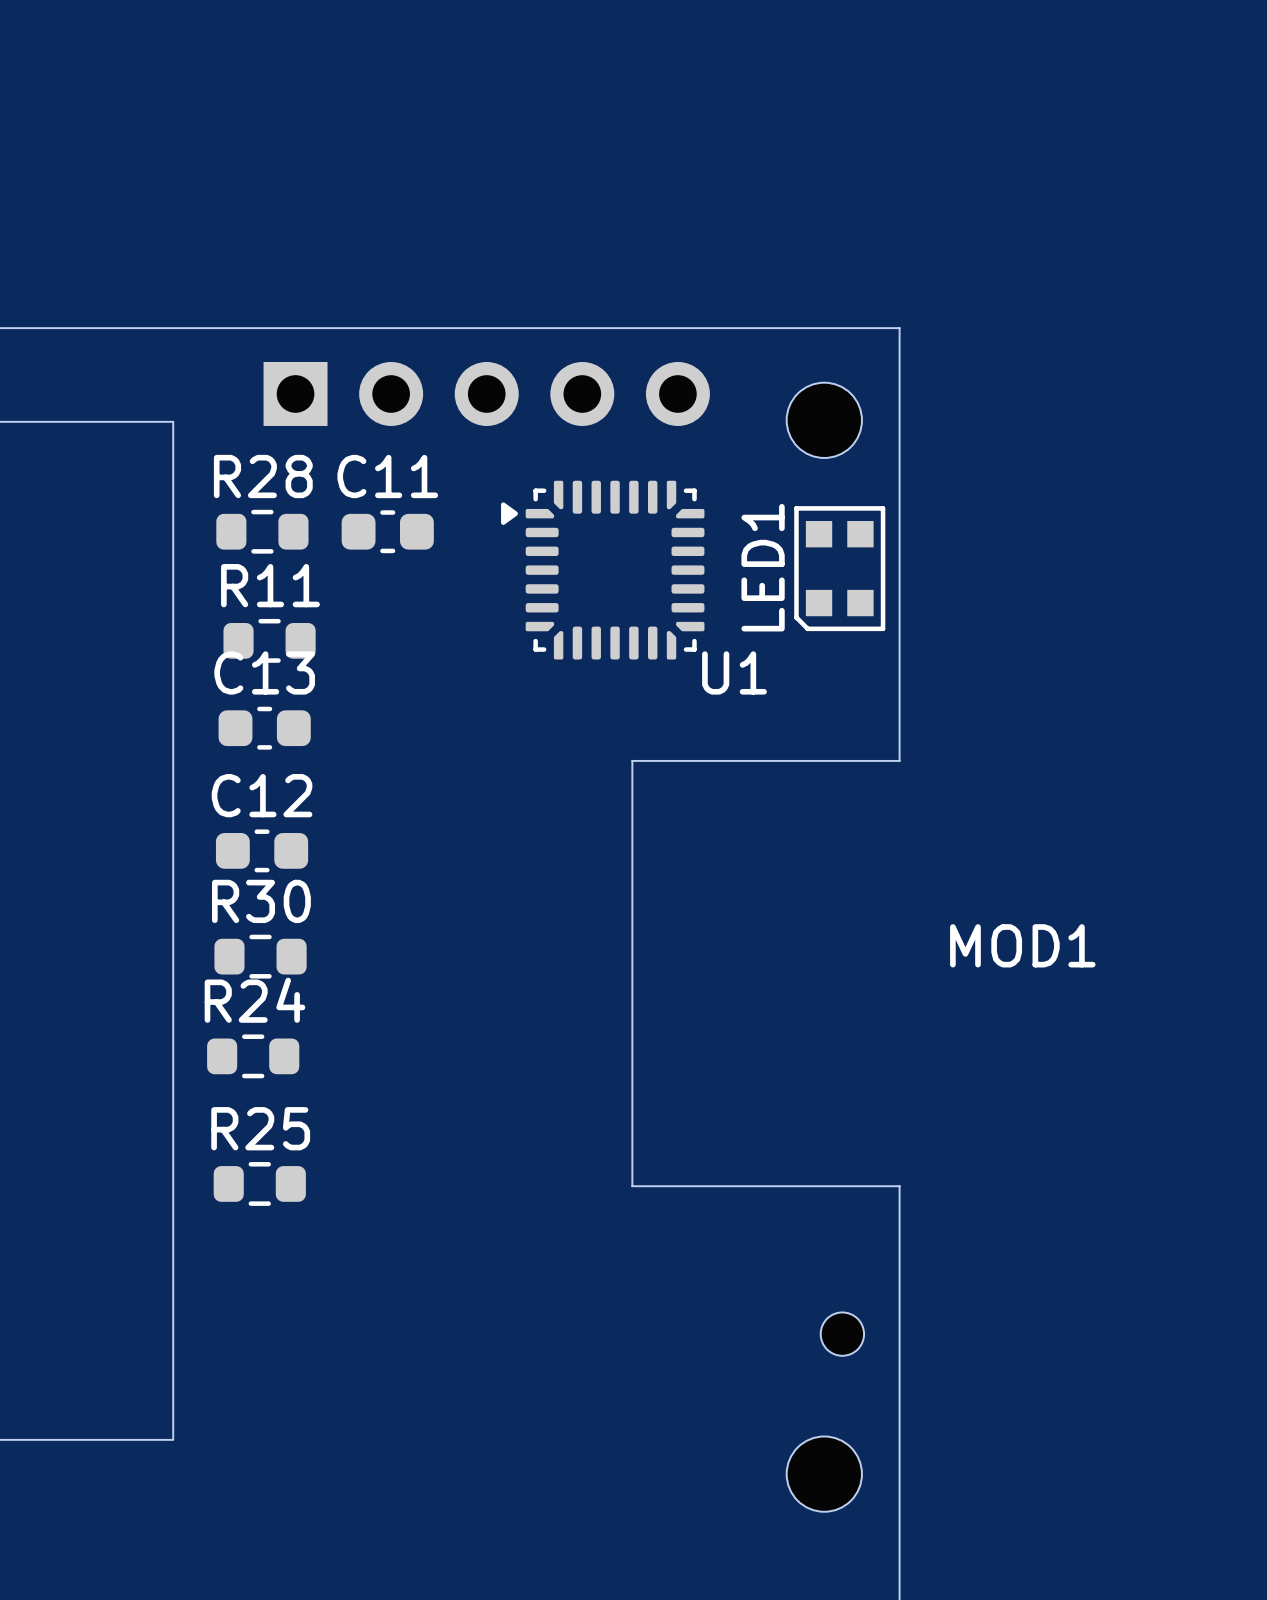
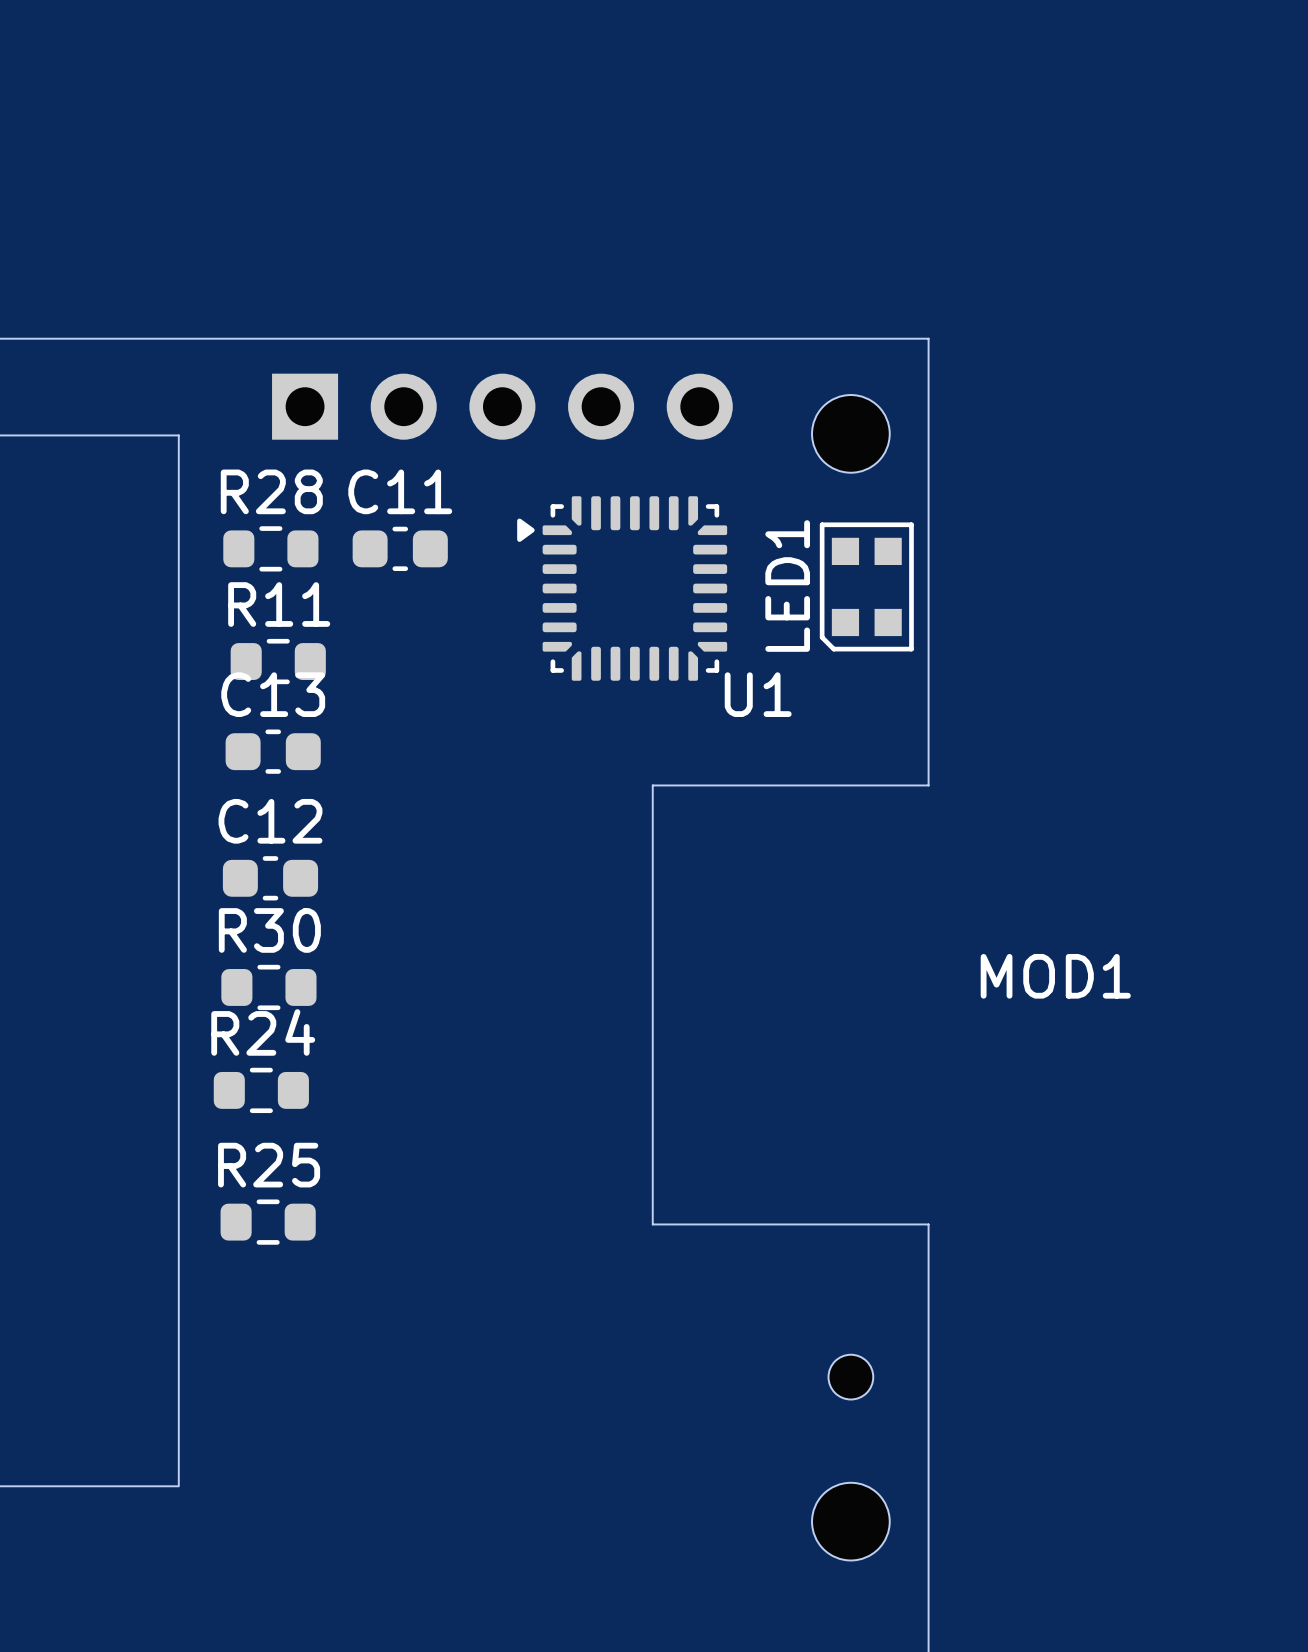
part position: (842, 1334) -> (850, 1377)

